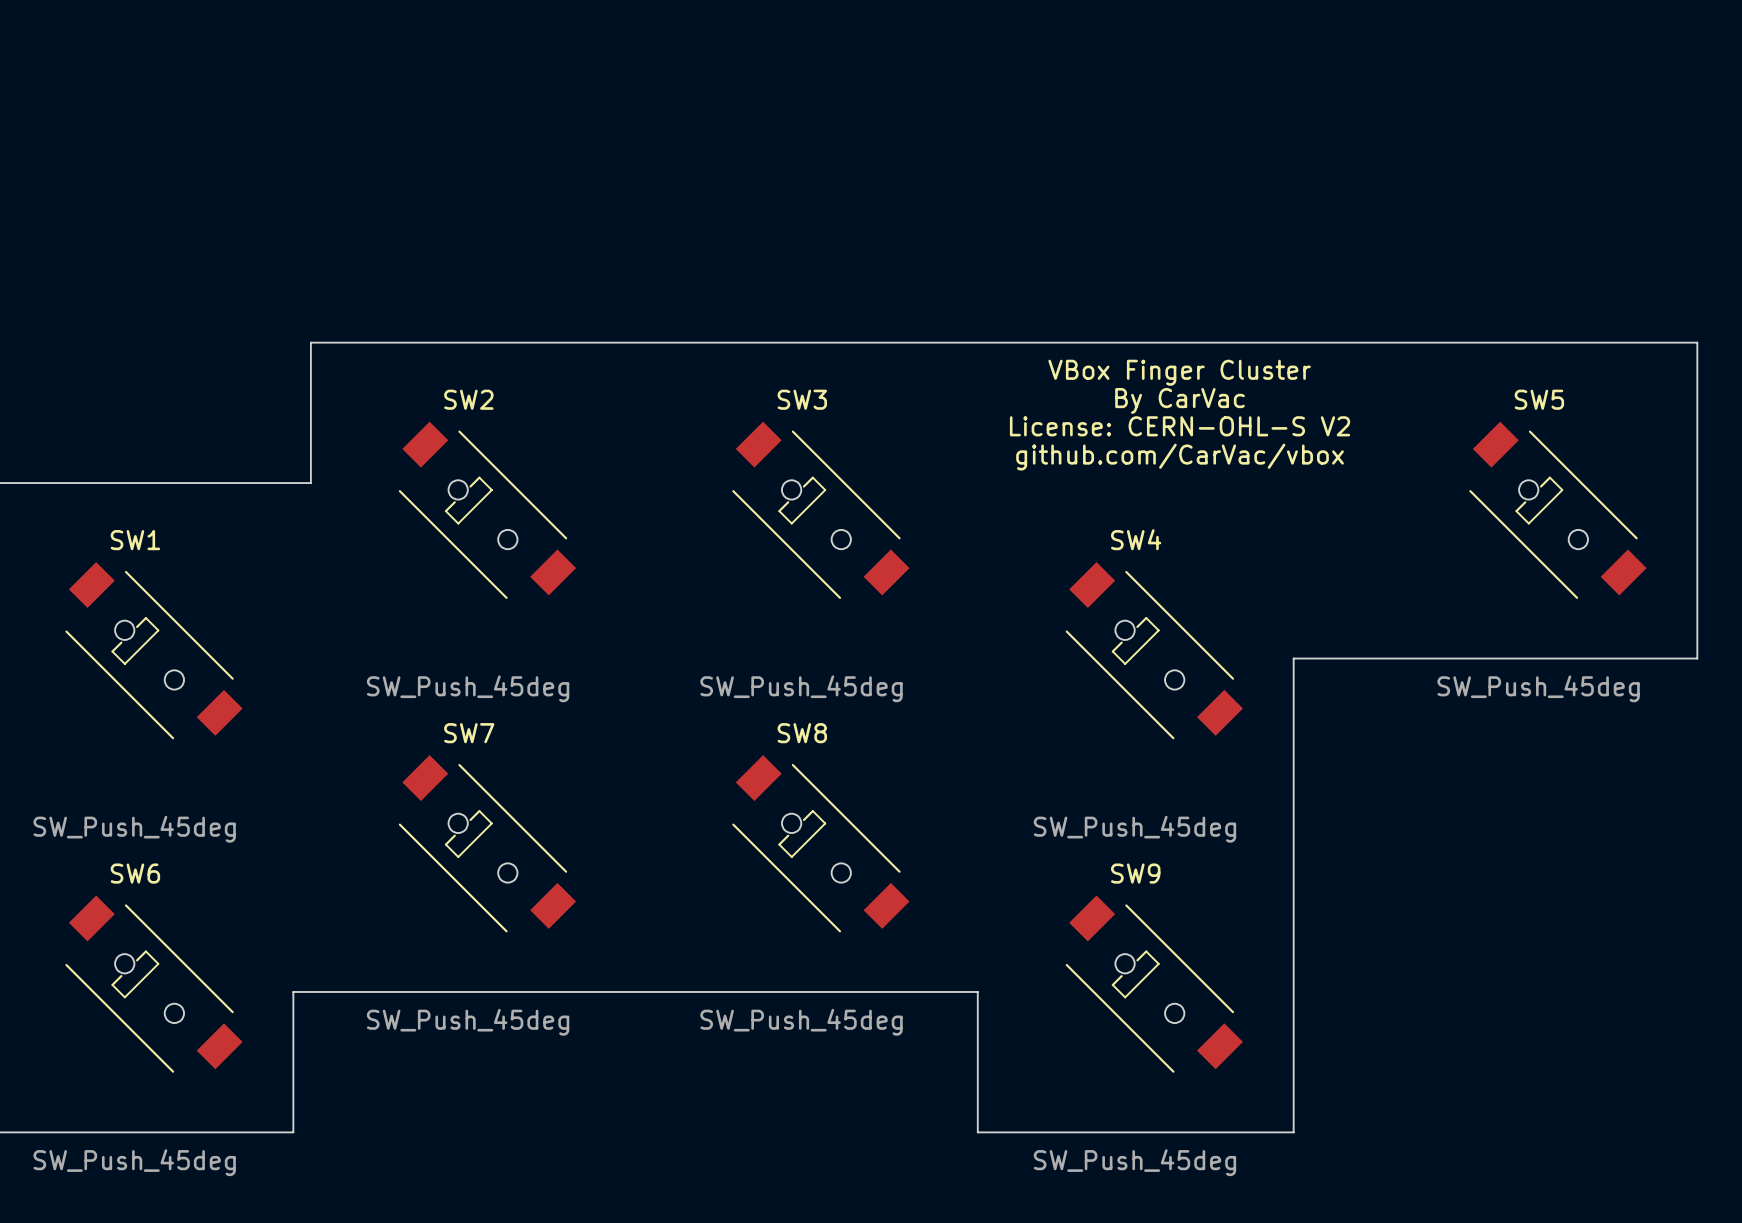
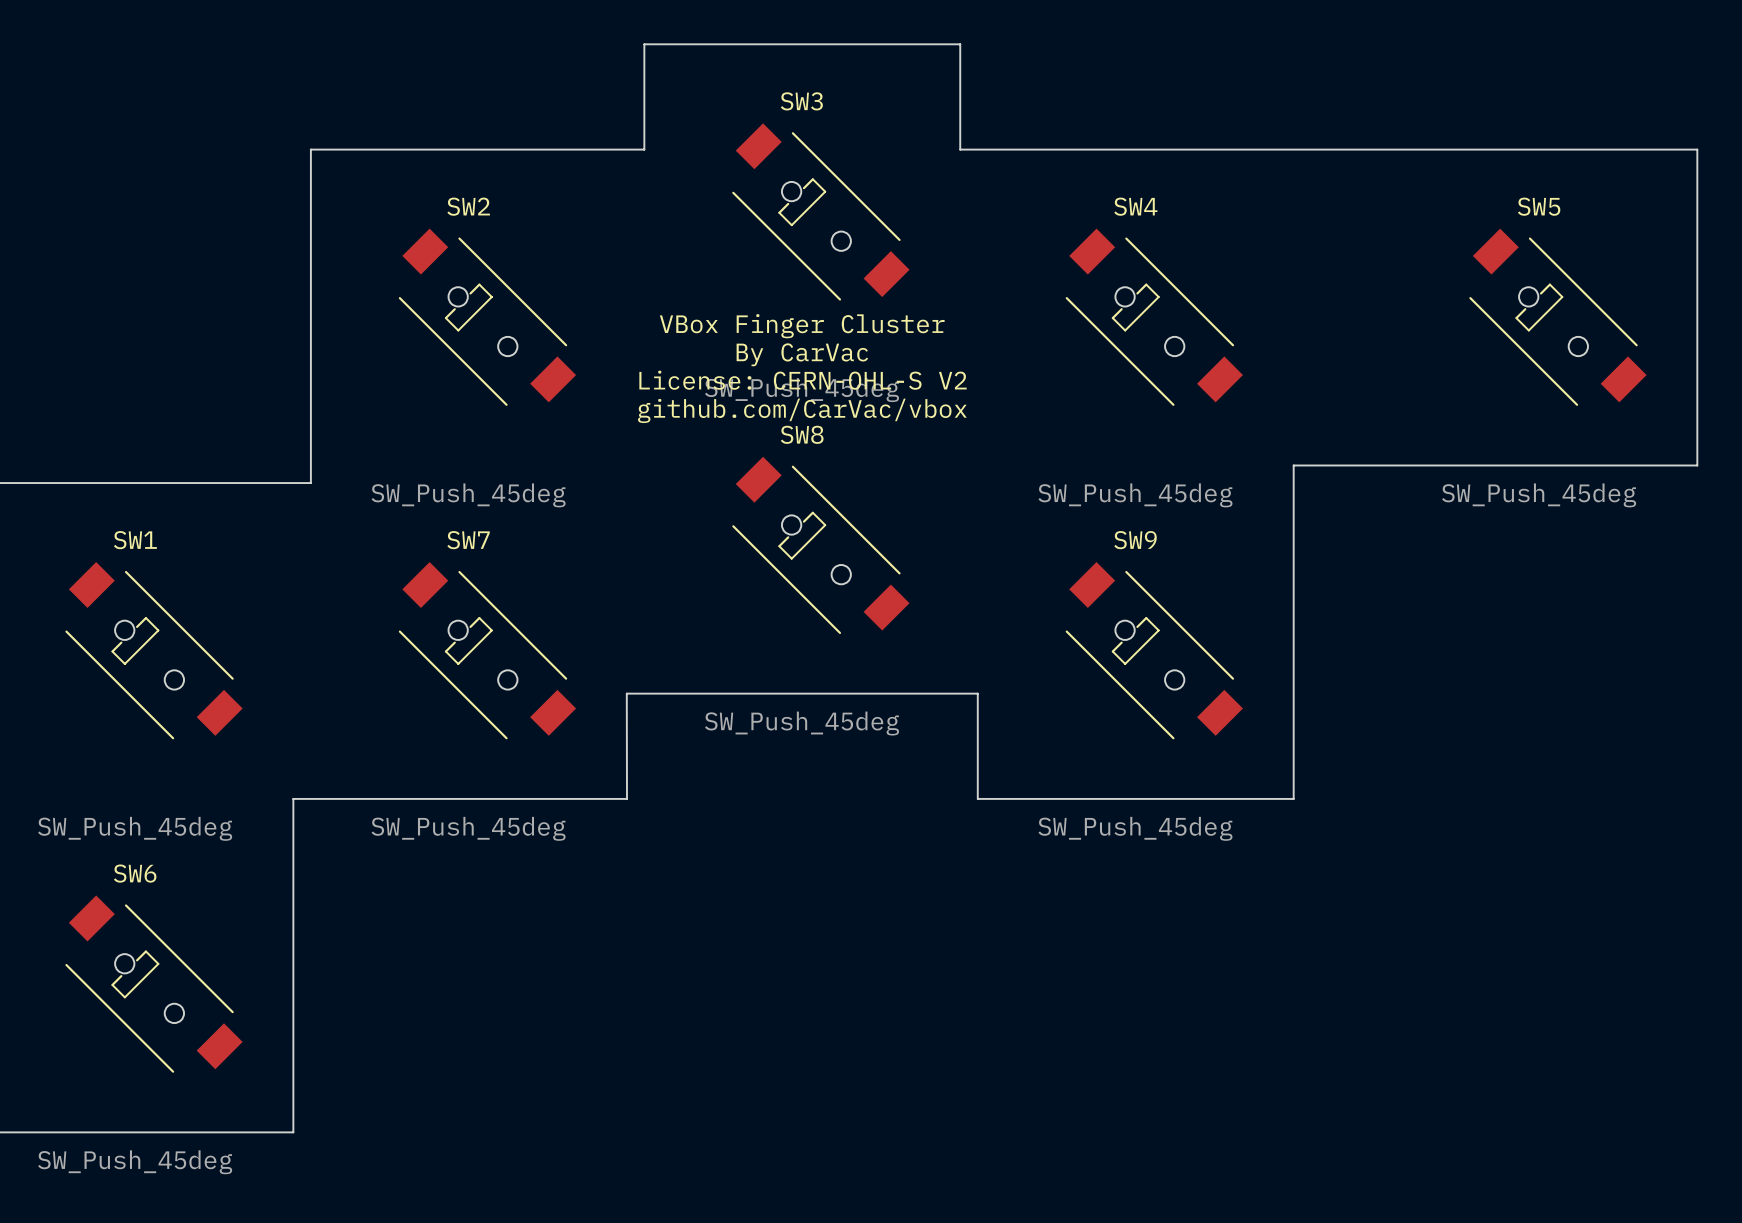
SW4: none -> SW_Push_45deg (1154, 317)
board edge: (310, 342) (1697, 342) -> (310, 342) (310, 149) (644, 149) (644, 44) (960, 44) (960, 149) (1697, 149) (1697, 342)
text position: VBox Finger Cluster (1179, 372) -> VBox Finger Cluster (802, 326)
text position: By CarVac (1180, 400) -> By CarVac (802, 354)
text position: License: CERN-OHL-S V2 (1180, 426) -> License: CERN-OHL-S V2 (803, 380)
text position: github.com/CarVac/vbox (1180, 457) -> github.com/CarVac/vbox (802, 410)
board edge: (1697, 465) (1697, 658) (1293, 658) -> (1697, 465) (1293, 465) (1293, 658)
SW2 position: (487, 510) -> (487, 317)
SW3 position: (820, 510) -> (820, 211)
SW5 position: (1557, 510) -> (1557, 317)
SW4 name: SW4 (1136, 539) -> SW9 (1135, 540)
board edge: (1293, 798) (1293, 1132) (977, 1132) (977, 991) (293, 991) -> (1293, 798) (977, 798) (977, 693) (626, 693) (627, 798) (293, 798) (293, 991)
SW7 position: (487, 843) -> (487, 650)
SW8 position: (820, 843) -> (820, 545)
SW9: SW_Push_45deg (1154, 984) -> none

